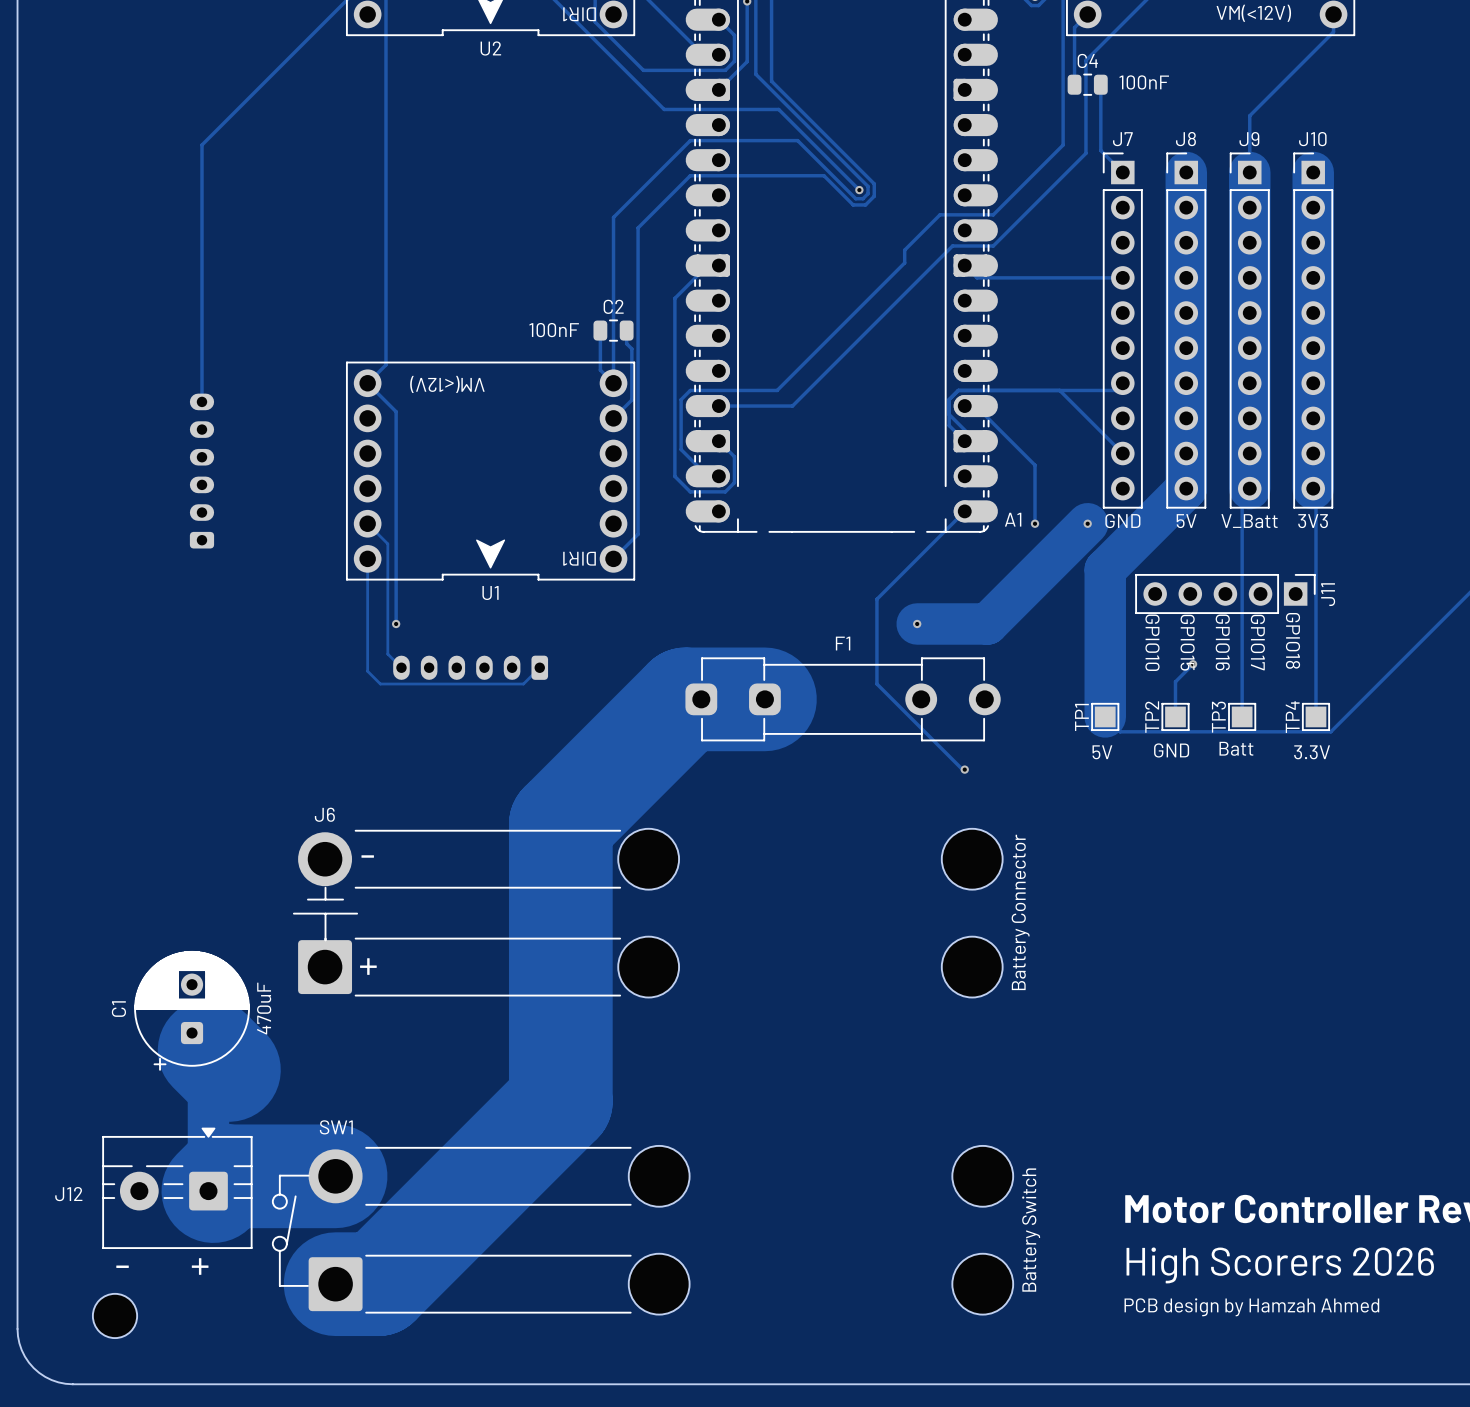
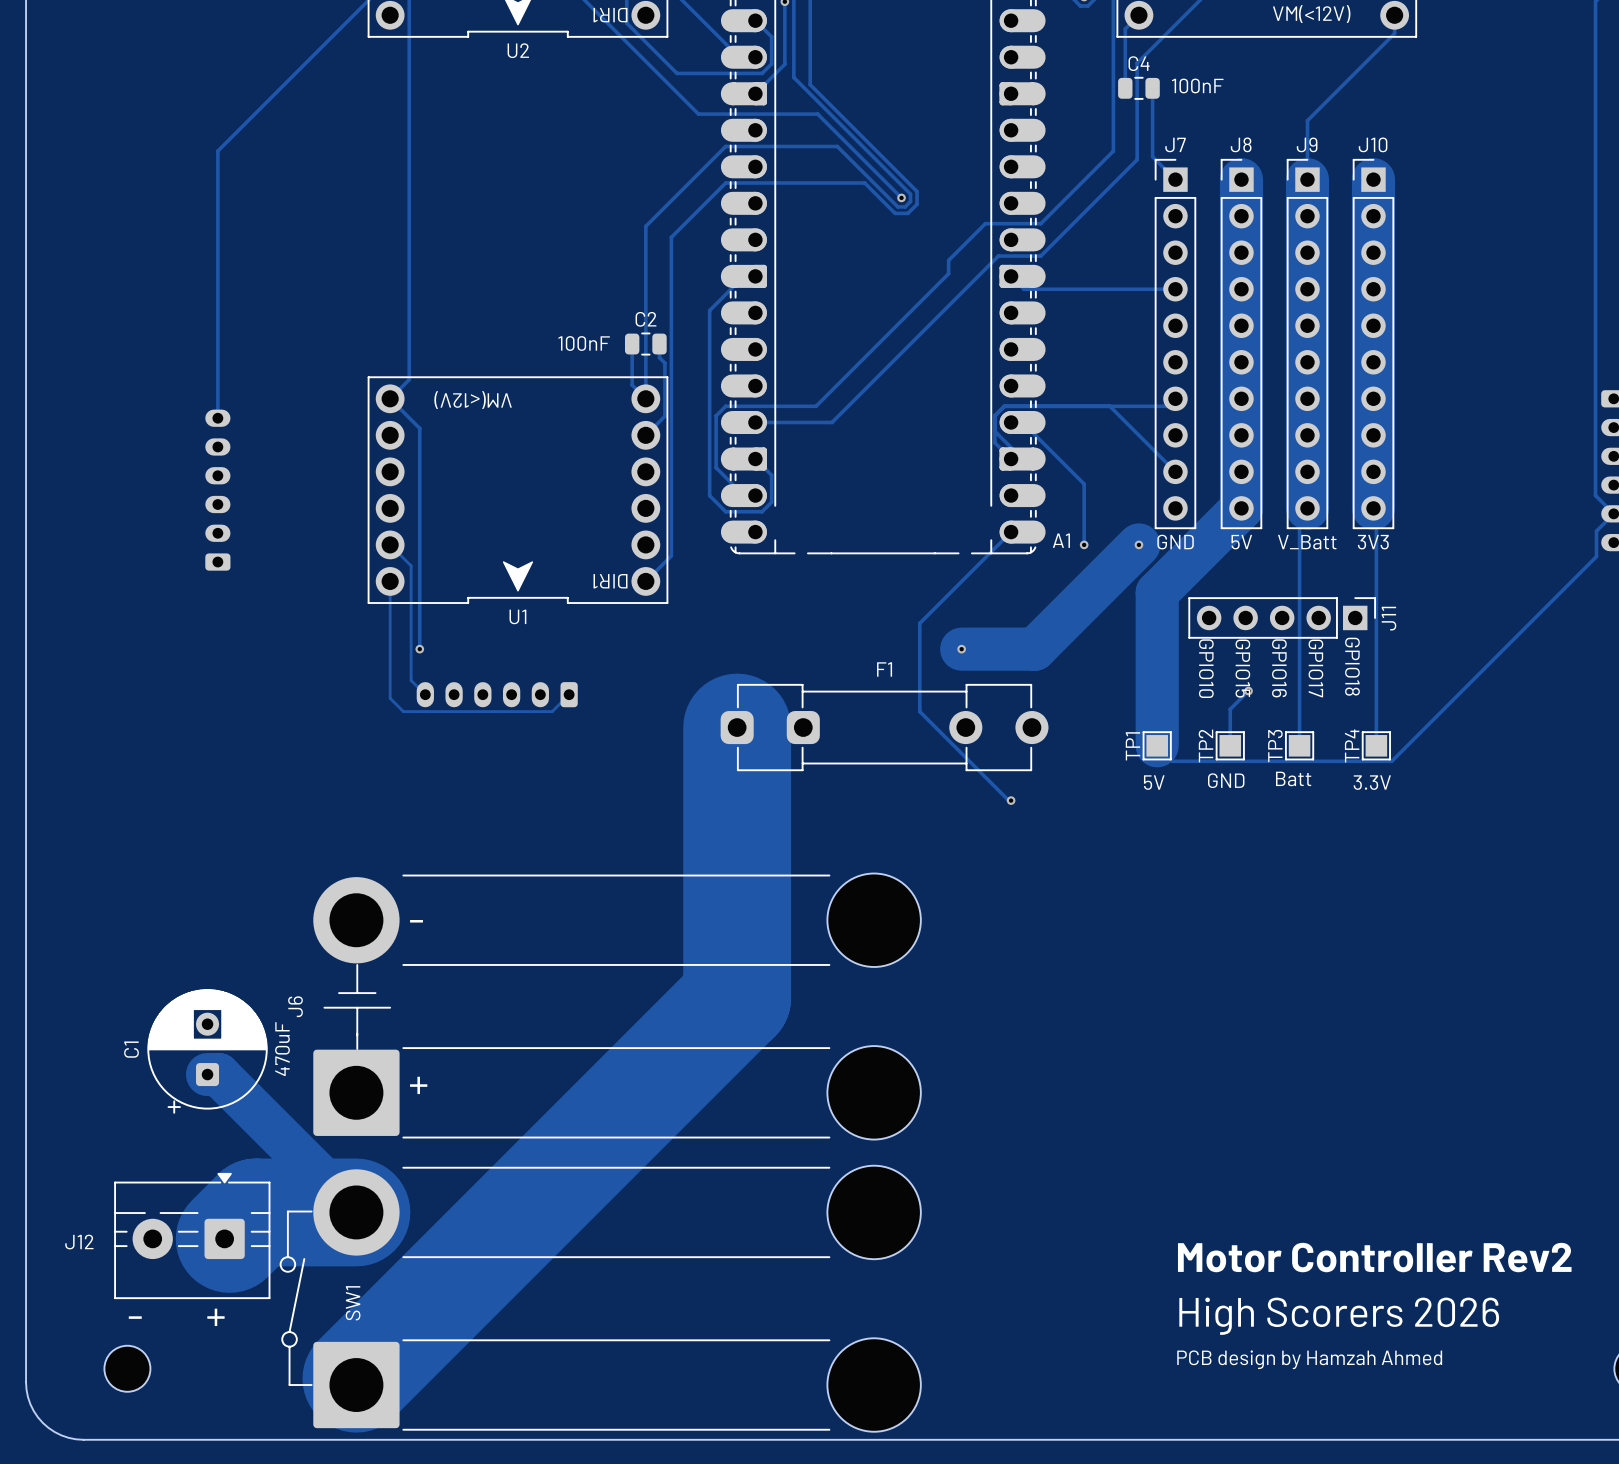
track: none -> (737, 727) (737, 997) (356, 1378)
track: (764, 699) (685, 699) (560, 823) (560, 1101) (378, 1284) (335, 1284) -> none
J6 name position: J6 (324, 814) -> J6 (295, 1006)
J6 footprint: [298, 828, 1003, 998] -> [313, 873, 921, 1140]
text position: - (367, 856) -> - (416, 921)
line: (325, 887) (325, 899) -> none
line: (307, 899) (343, 899) -> (339, 993) (375, 993)
J6 value: Battery Connector (1020, 912) -> none
line: (293, 913) (357, 913) -> (324, 1007) (390, 1007)
line: (325, 913) (325, 940) -> none
line: none -> (357, 964) (357, 993)
text position: + (368, 966) -> + (418, 1085)
line: none -> (357, 1007) (357, 1048)
track: (209, 1050) (228, 1069) (208, 1090) (208, 1191) -> none
SW1 name position: SW1 (336, 1127) -> SW1 (353, 1303)
SW1 footprint: [308, 1145, 1014, 1315] -> [313, 1165, 921, 1432]
line: none -> (311, 1211) (287, 1211) (287, 1257)
line: (308, 1175) (279, 1175) (279, 1194) -> none
track: (228, 1176) (335, 1176) -> (245, 1223) (256, 1212) (356, 1212) (218, 1074) (207, 1074)
drawing: [272, 1193, 288, 1210] -> none
line: (295, 1196) (286, 1243) -> none
drawing: none -> [279, 1256, 296, 1273]
line: none -> (304, 1259) (289, 1332)
SW1 value: Battery Switch (1031, 1230) -> none
drawing: [272, 1236, 288, 1252] -> none
line: (279, 1250) (279, 1285) (307, 1285) -> none
drawing: none -> [281, 1331, 298, 1348]
line: none -> (289, 1346) (289, 1385) (311, 1385)

